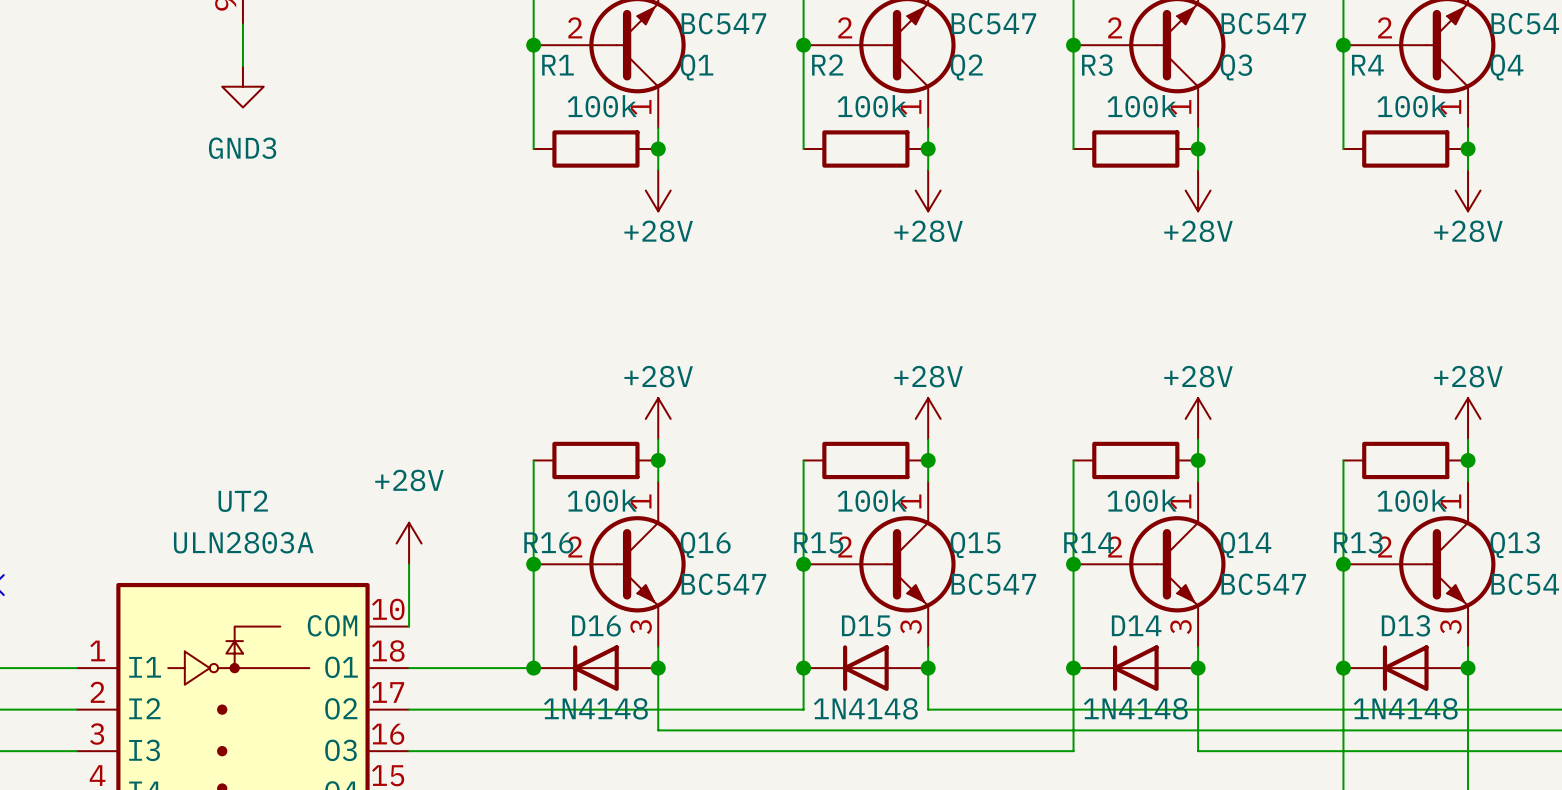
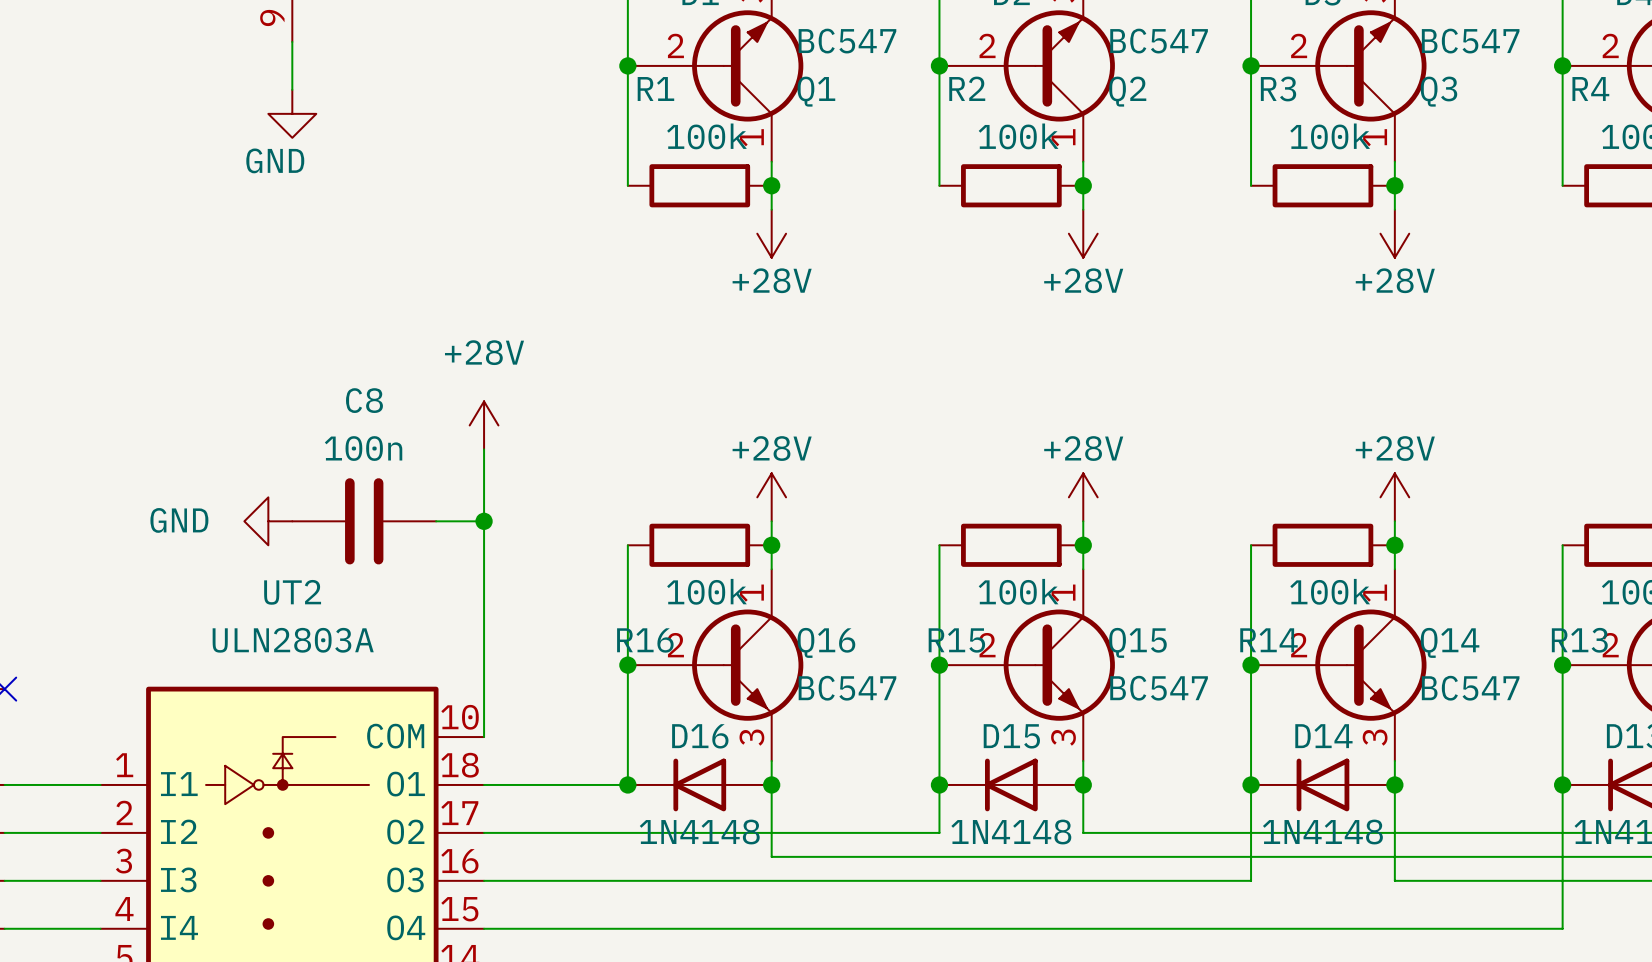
power symbol: GND3 (242, 86) -> GND (292, 113)
wire: none -> (484, 449) (484, 665)
power symbol: none -> GND (268, 521)
C8: none -> 100n (364, 521)
wire: none -> (436, 521) (484, 521)
junction: none -> (484, 521)
power symbol position: +28V (409, 543) -> +28V (484, 425)

